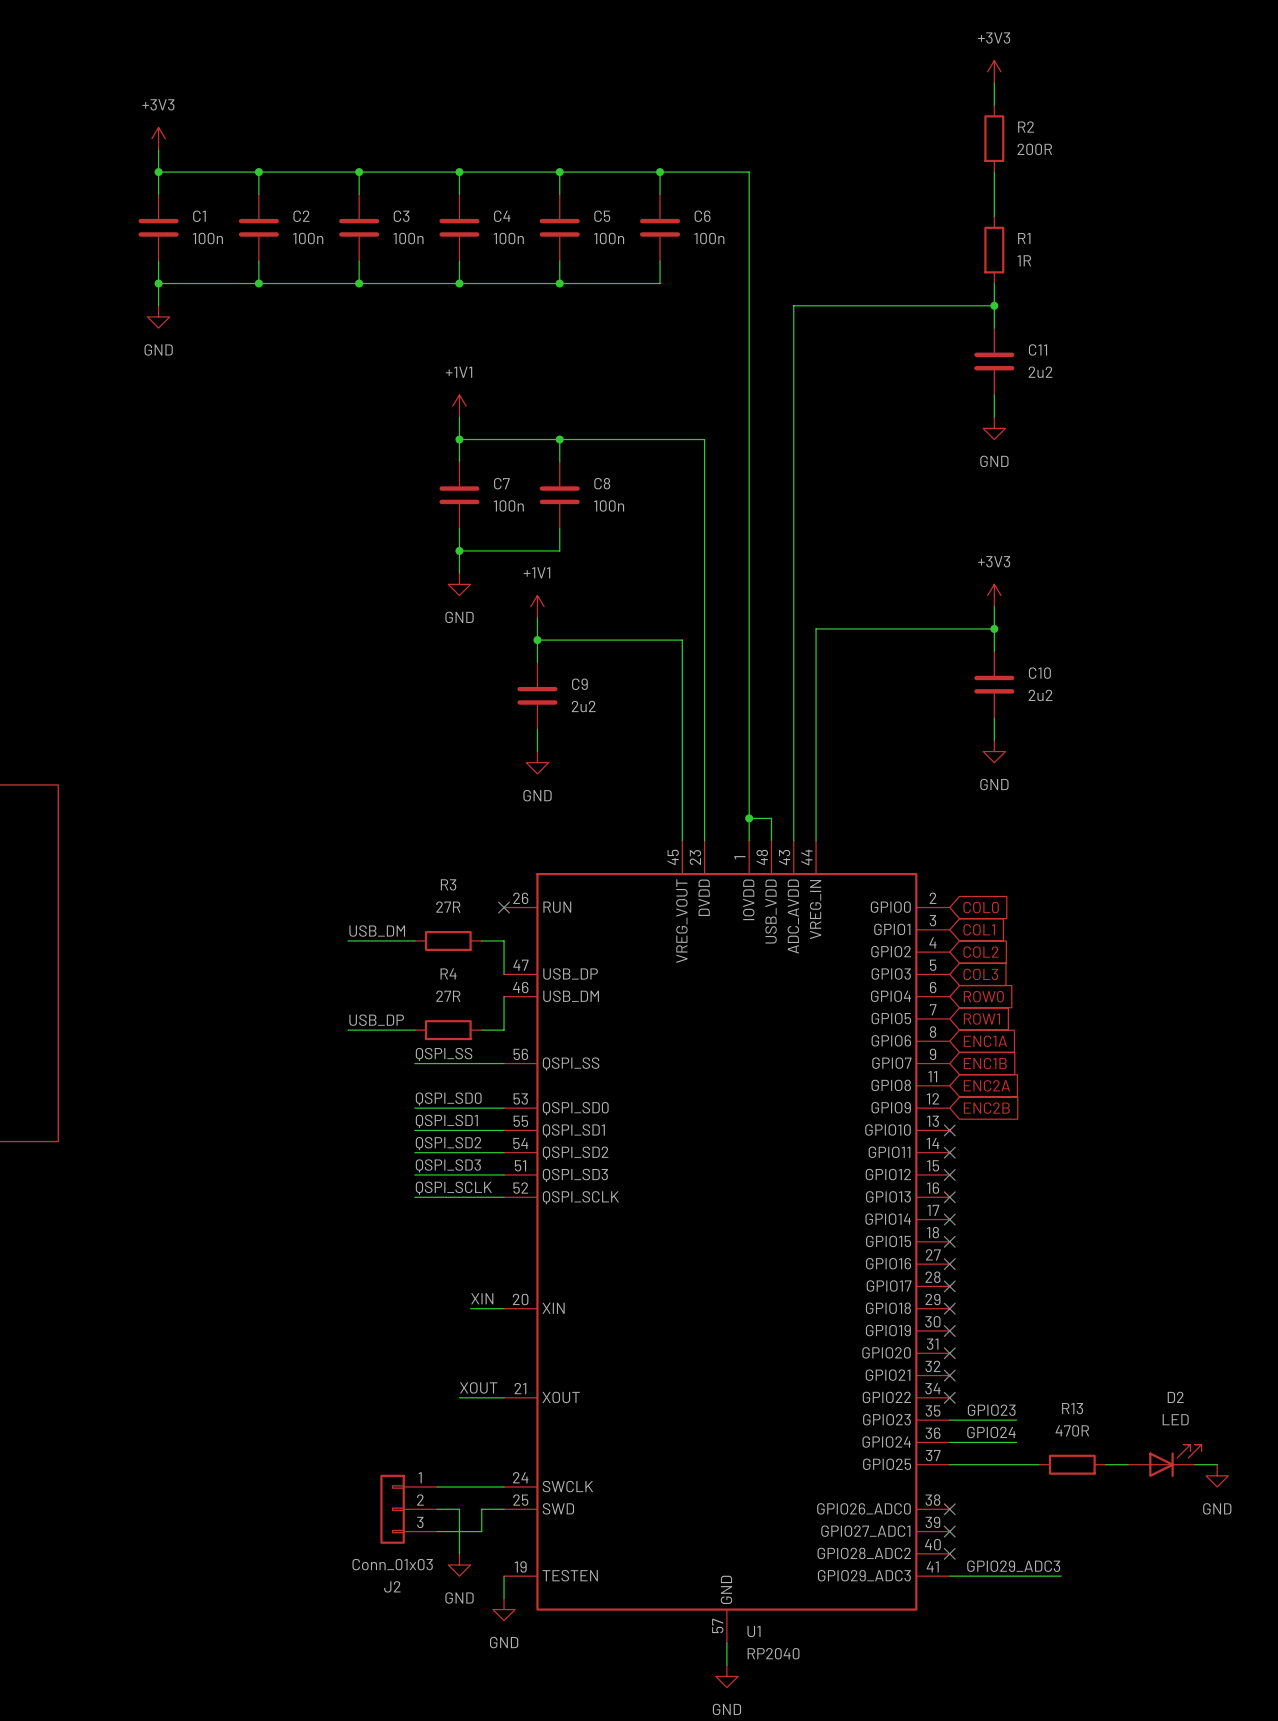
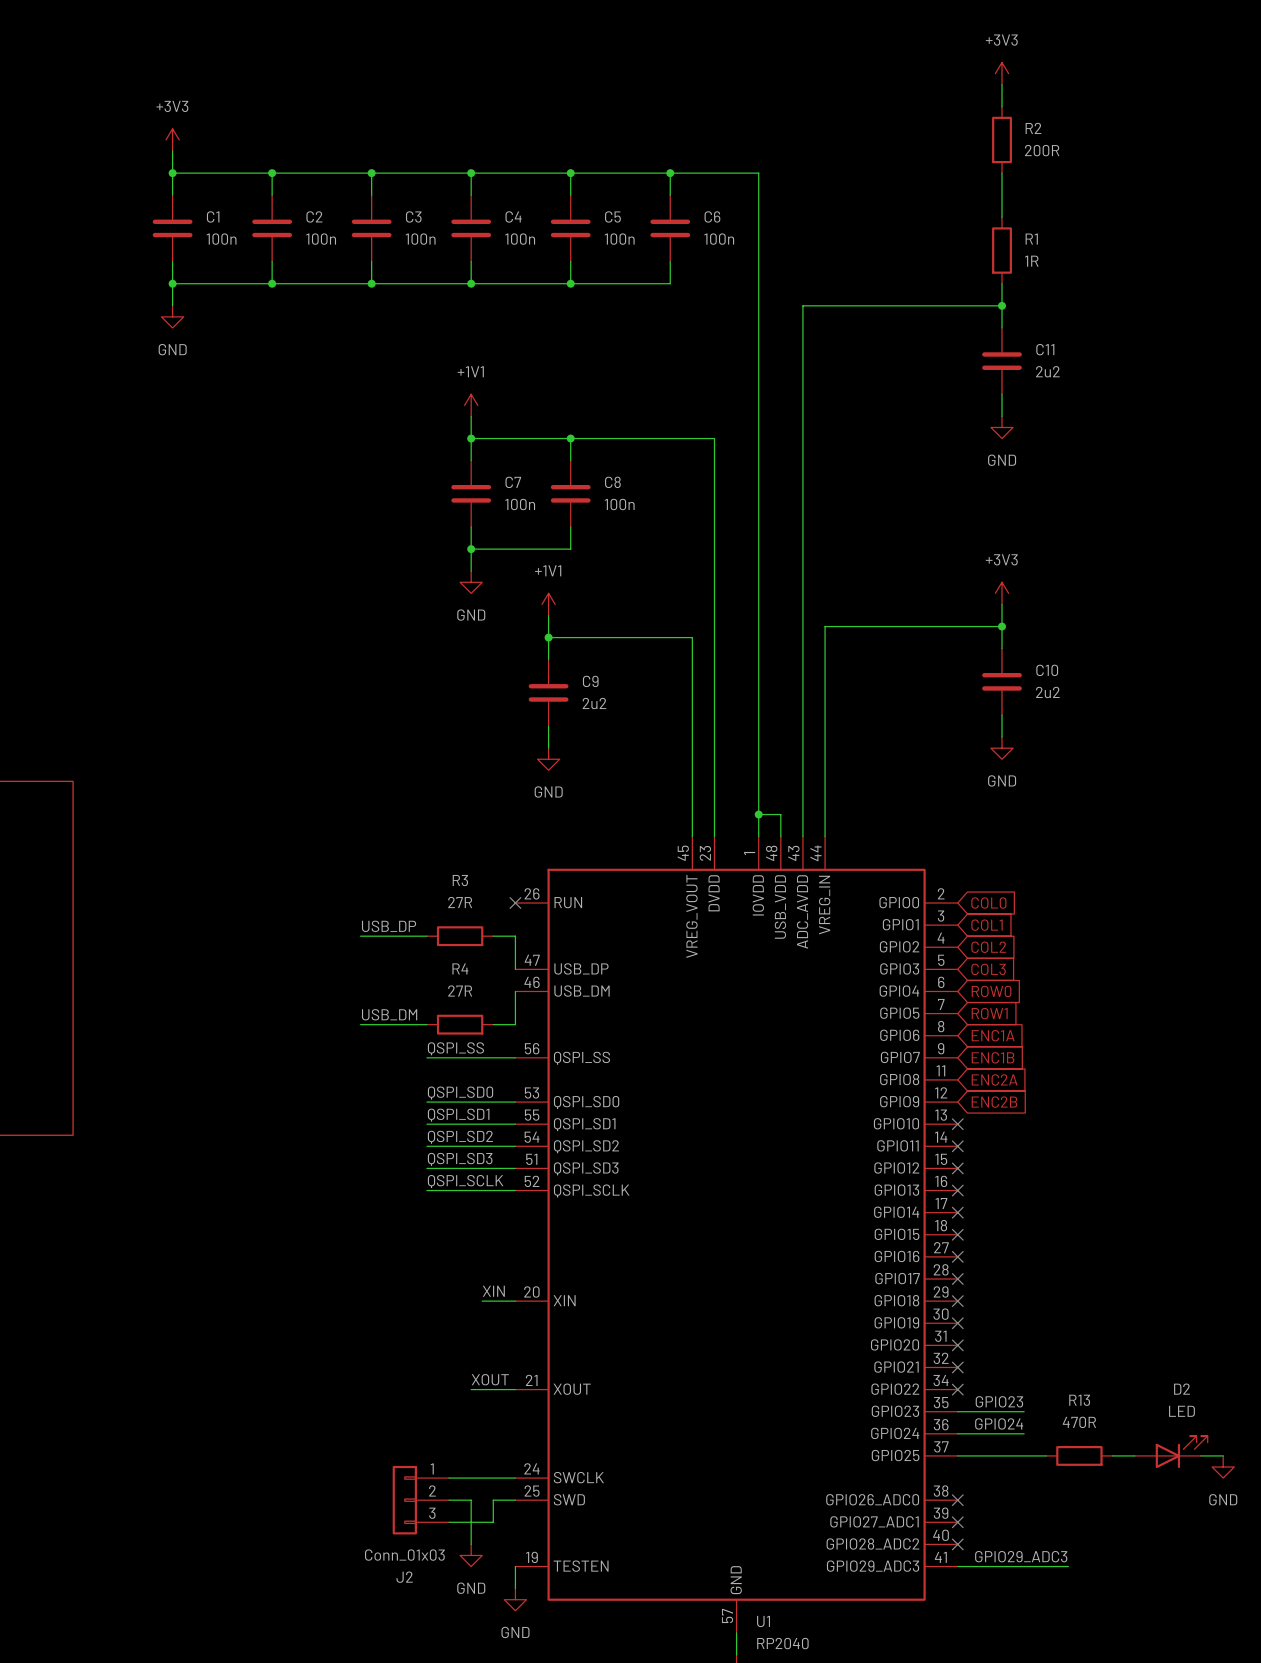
label: USB_DM (377, 931) -> USB_DP (389, 926)
label: USB_DP (376, 1020) -> USB_DM (389, 1014)

